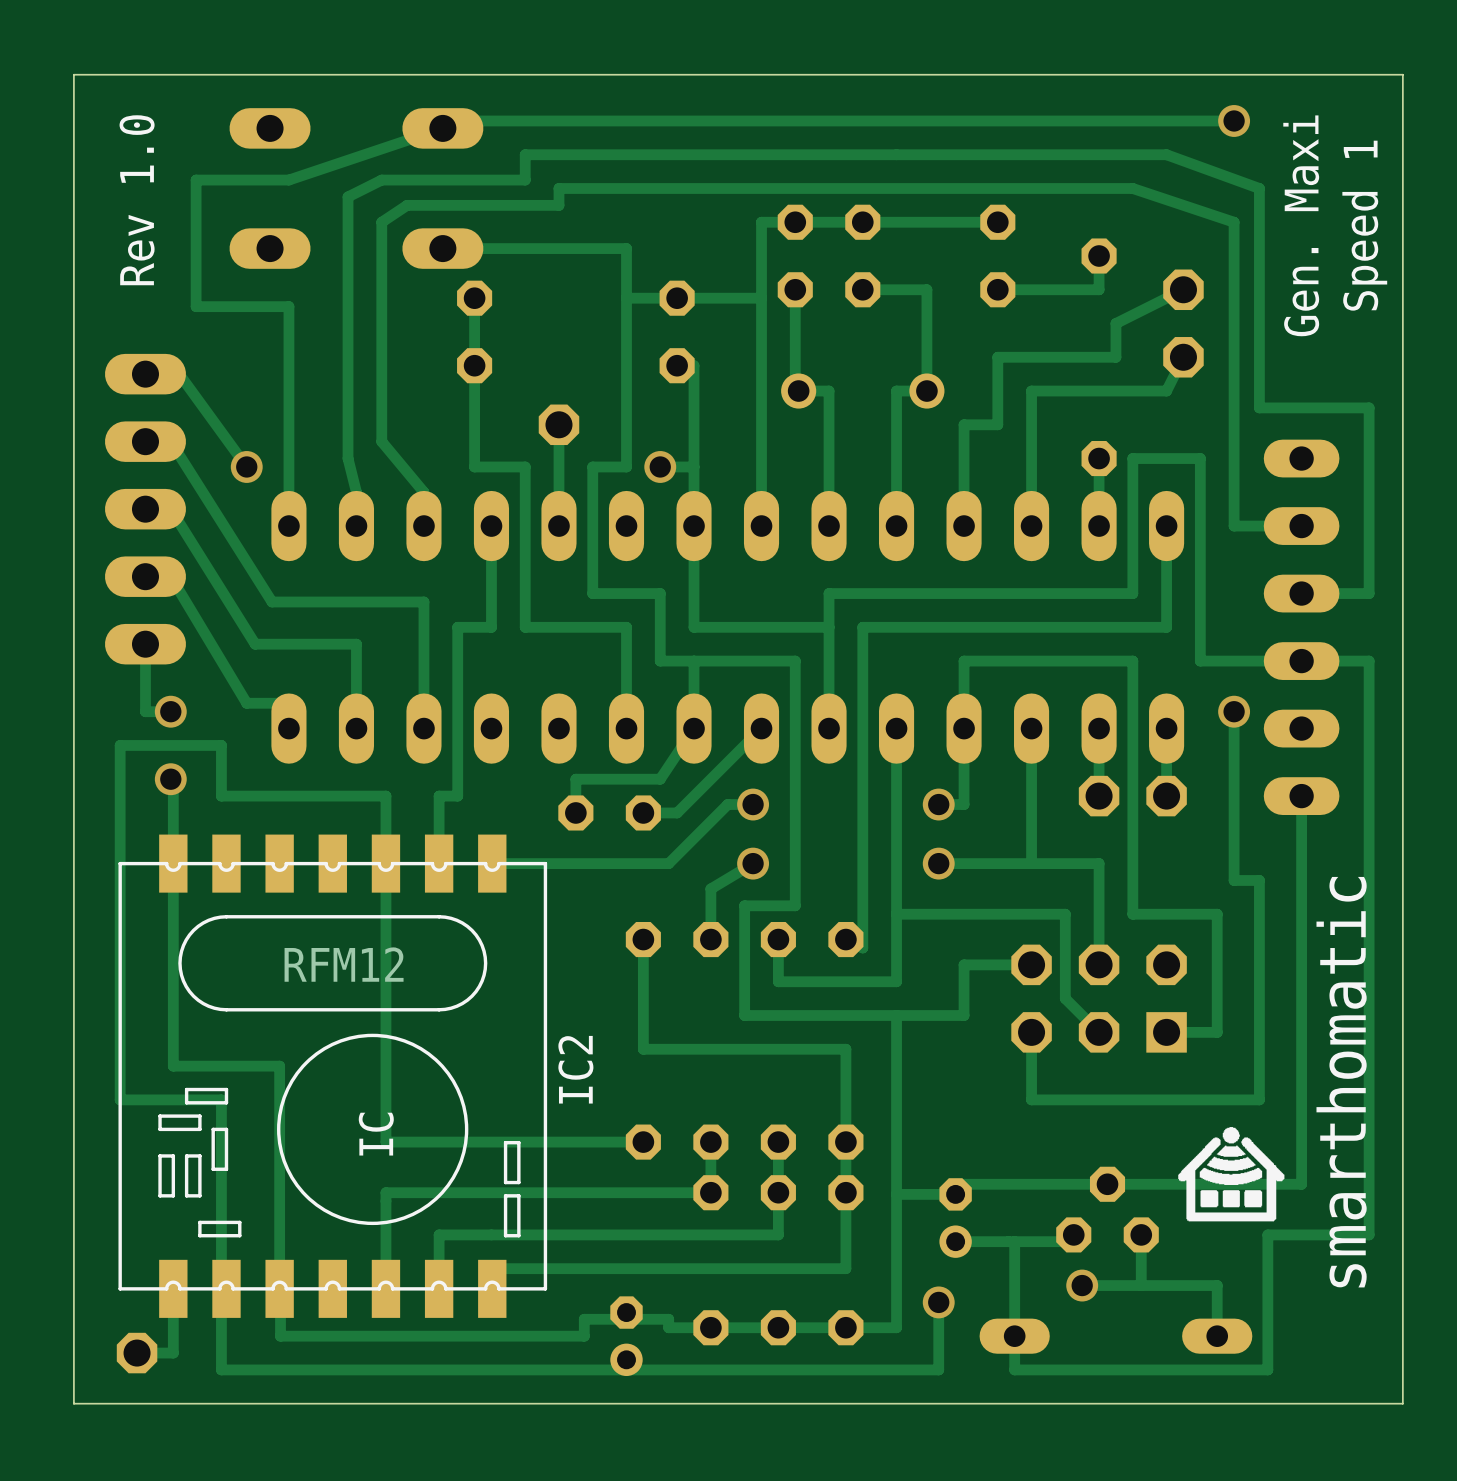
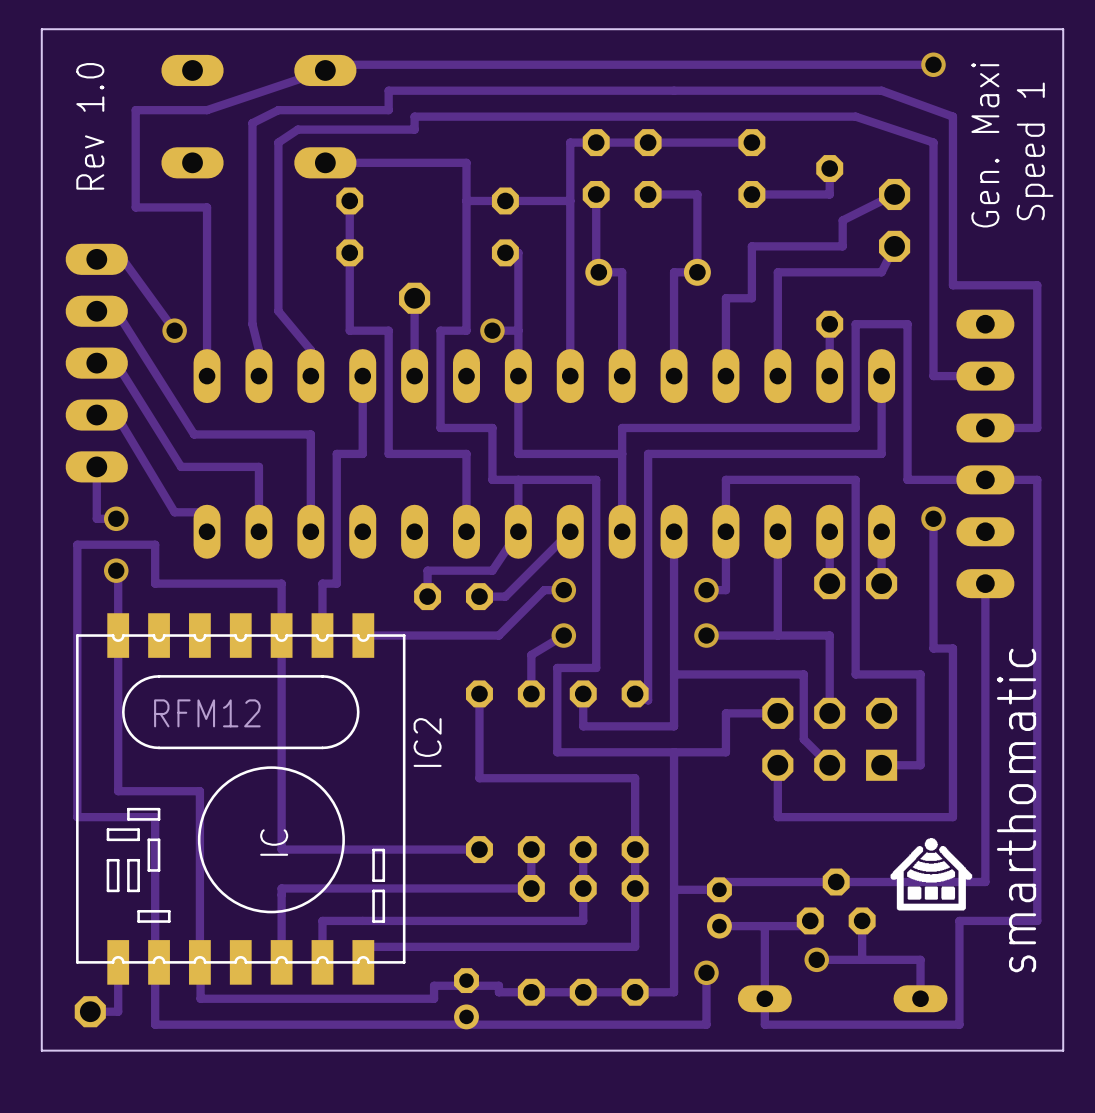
IC2 value position: RFM12 (344, 964) -> RFM12 (207, 713)
IC2 name position: IC2 (575, 1069) -> IC2 (427, 742)

